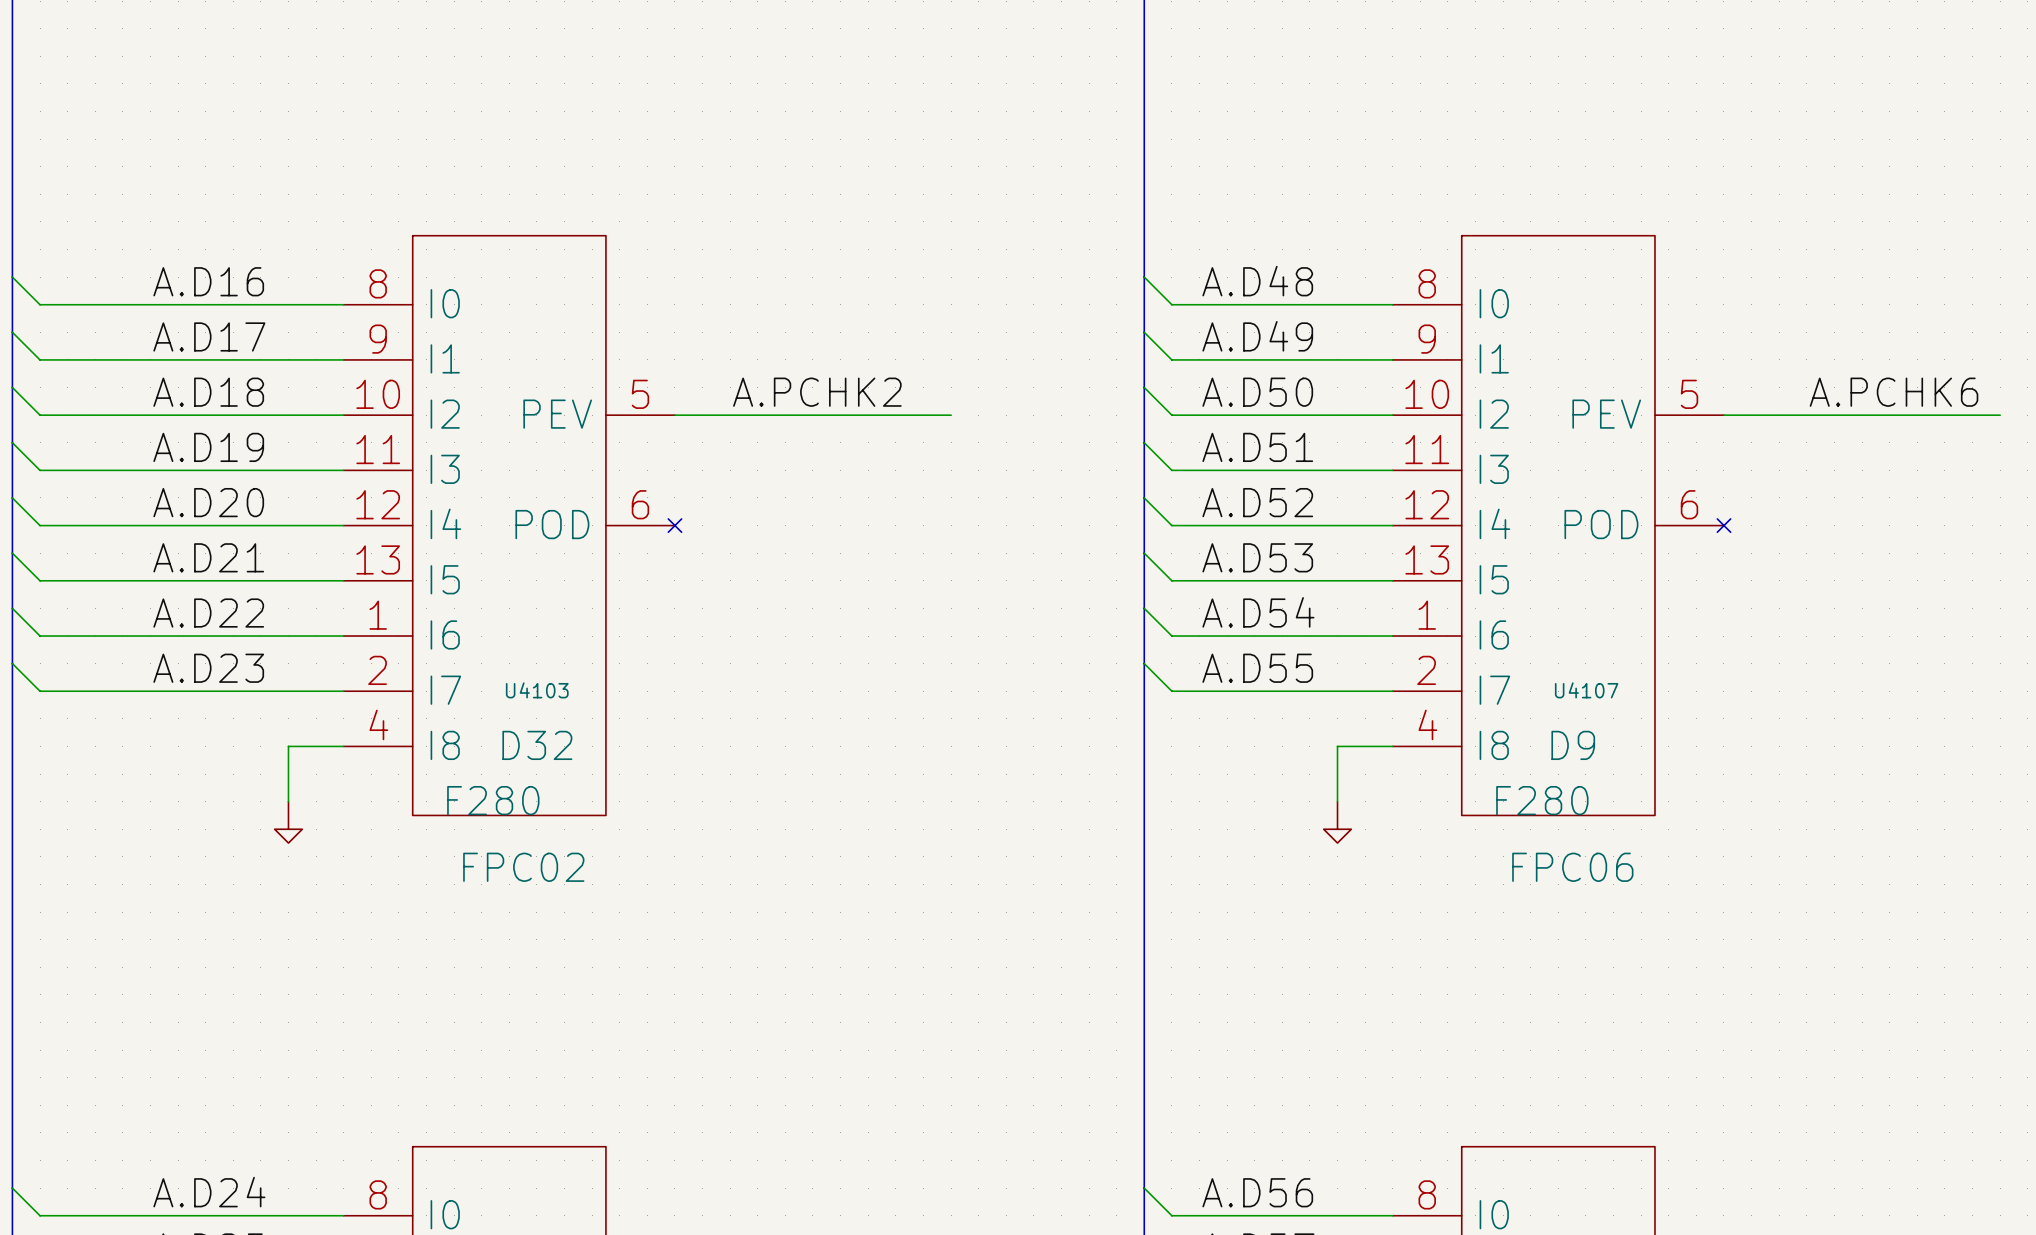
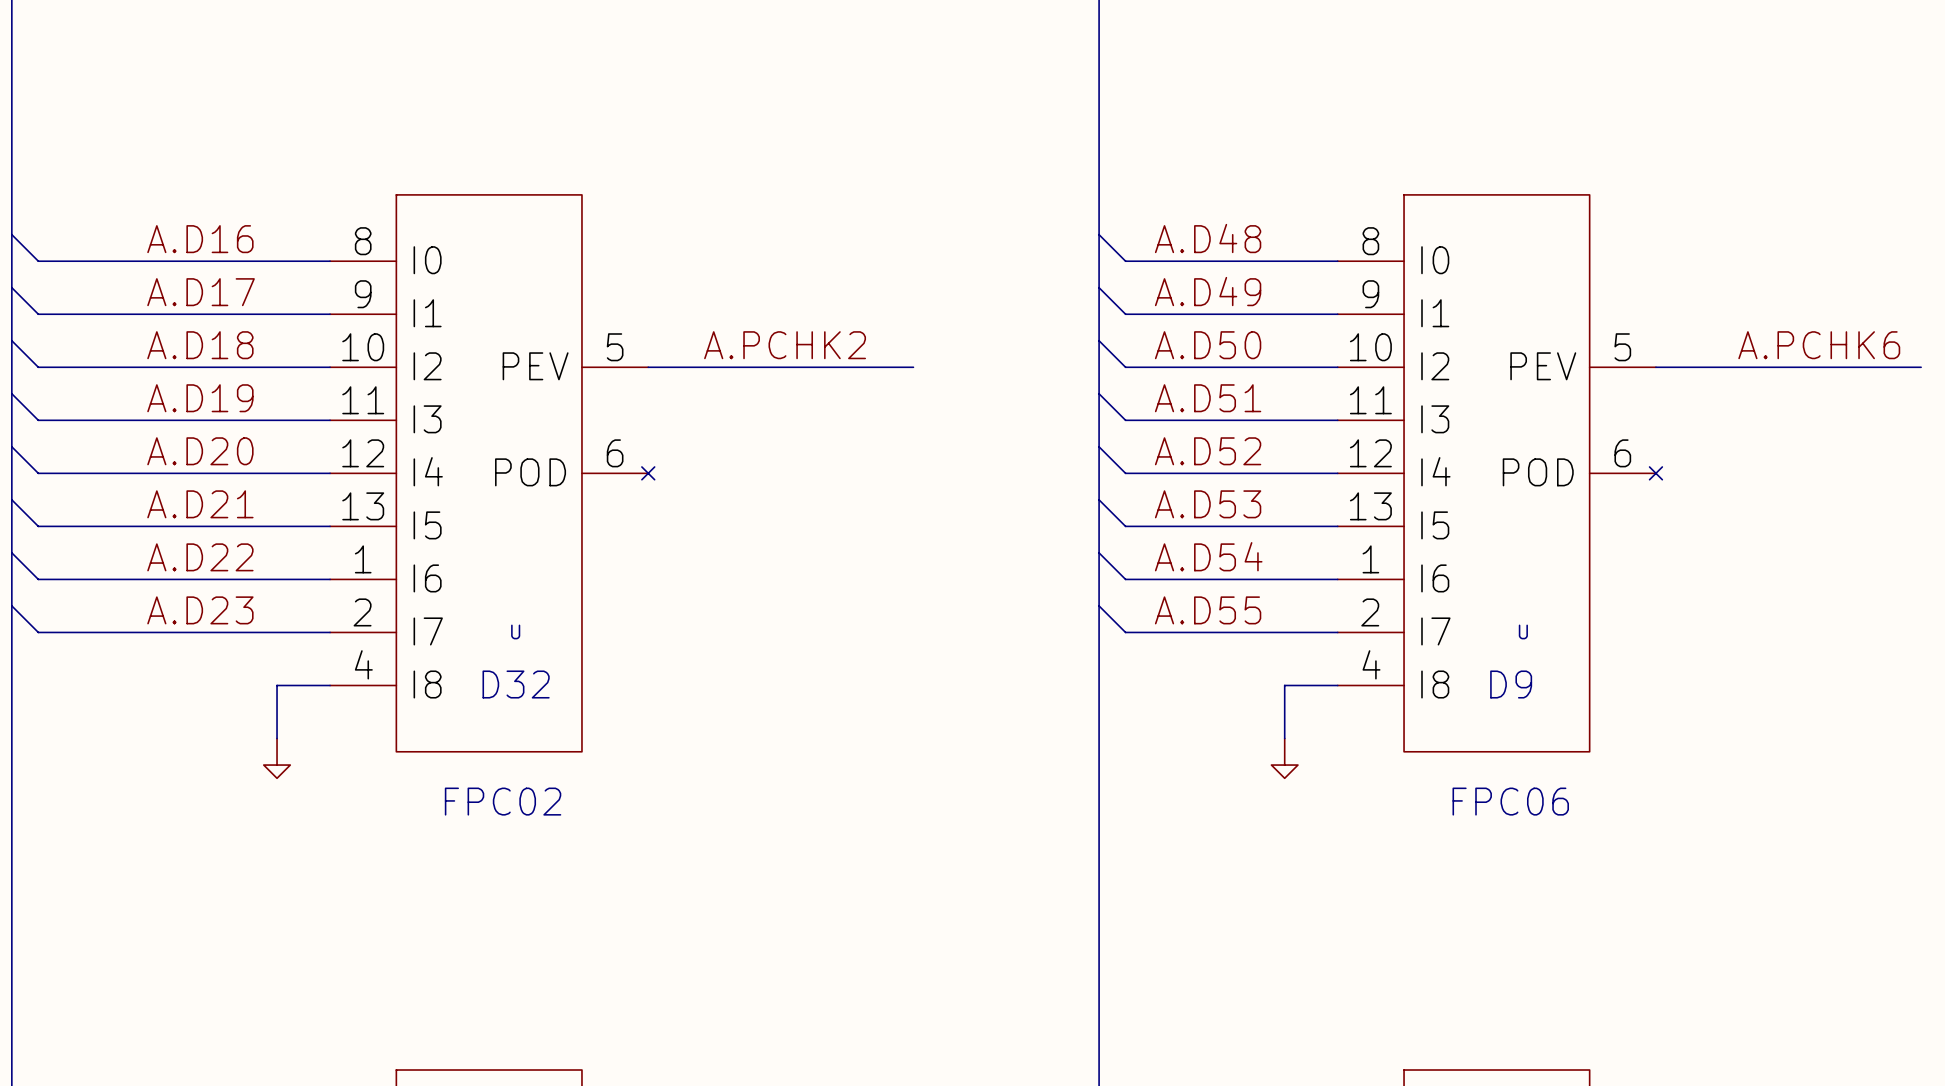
U4103 name: U4103 (537, 690) -> U (515, 631)
U4107 name: U4107 (1586, 690) -> U (1523, 631)
U4103 value: F280 (493, 800) -> none
U4107 value: F280 (1542, 800) -> none

